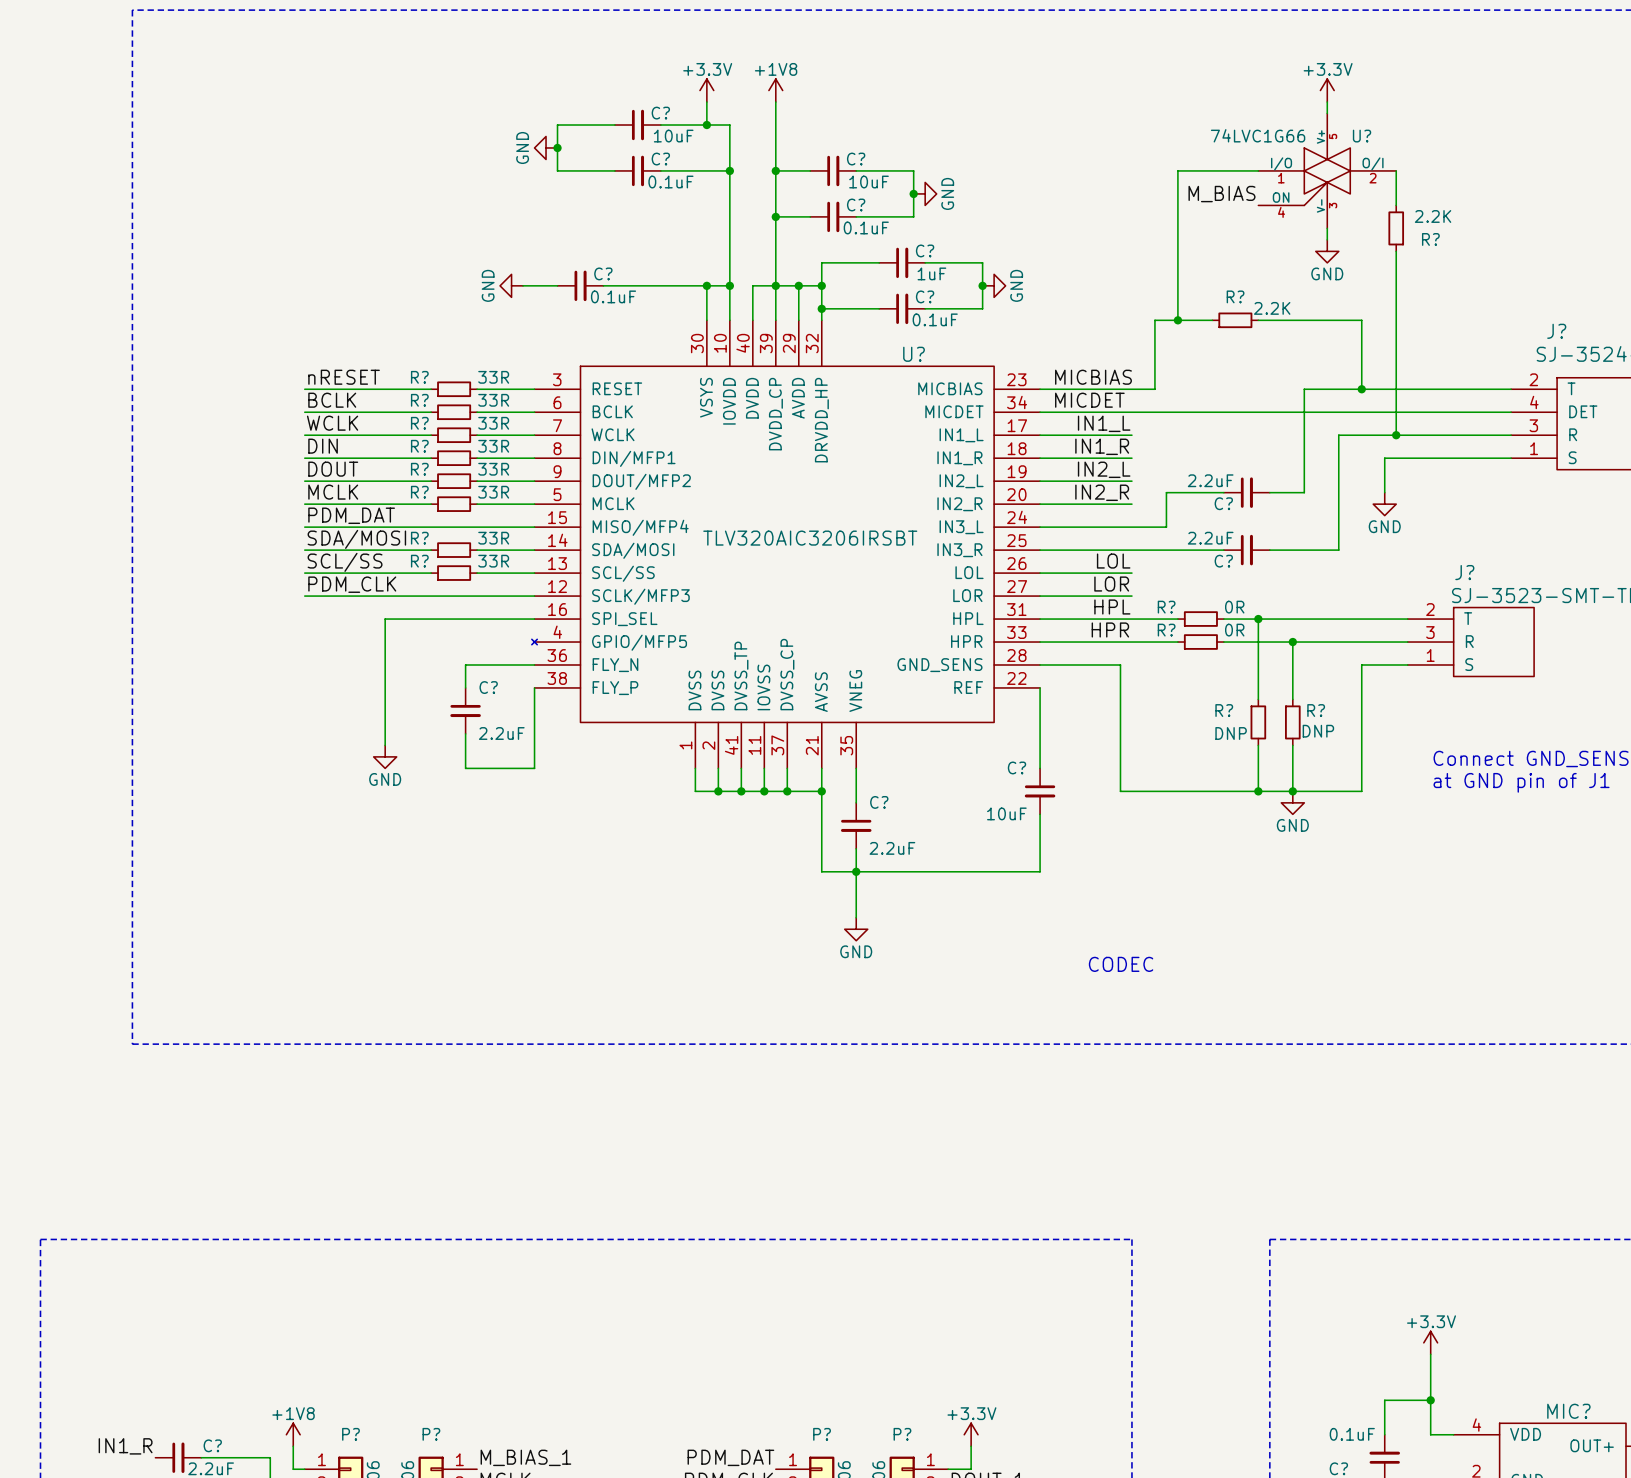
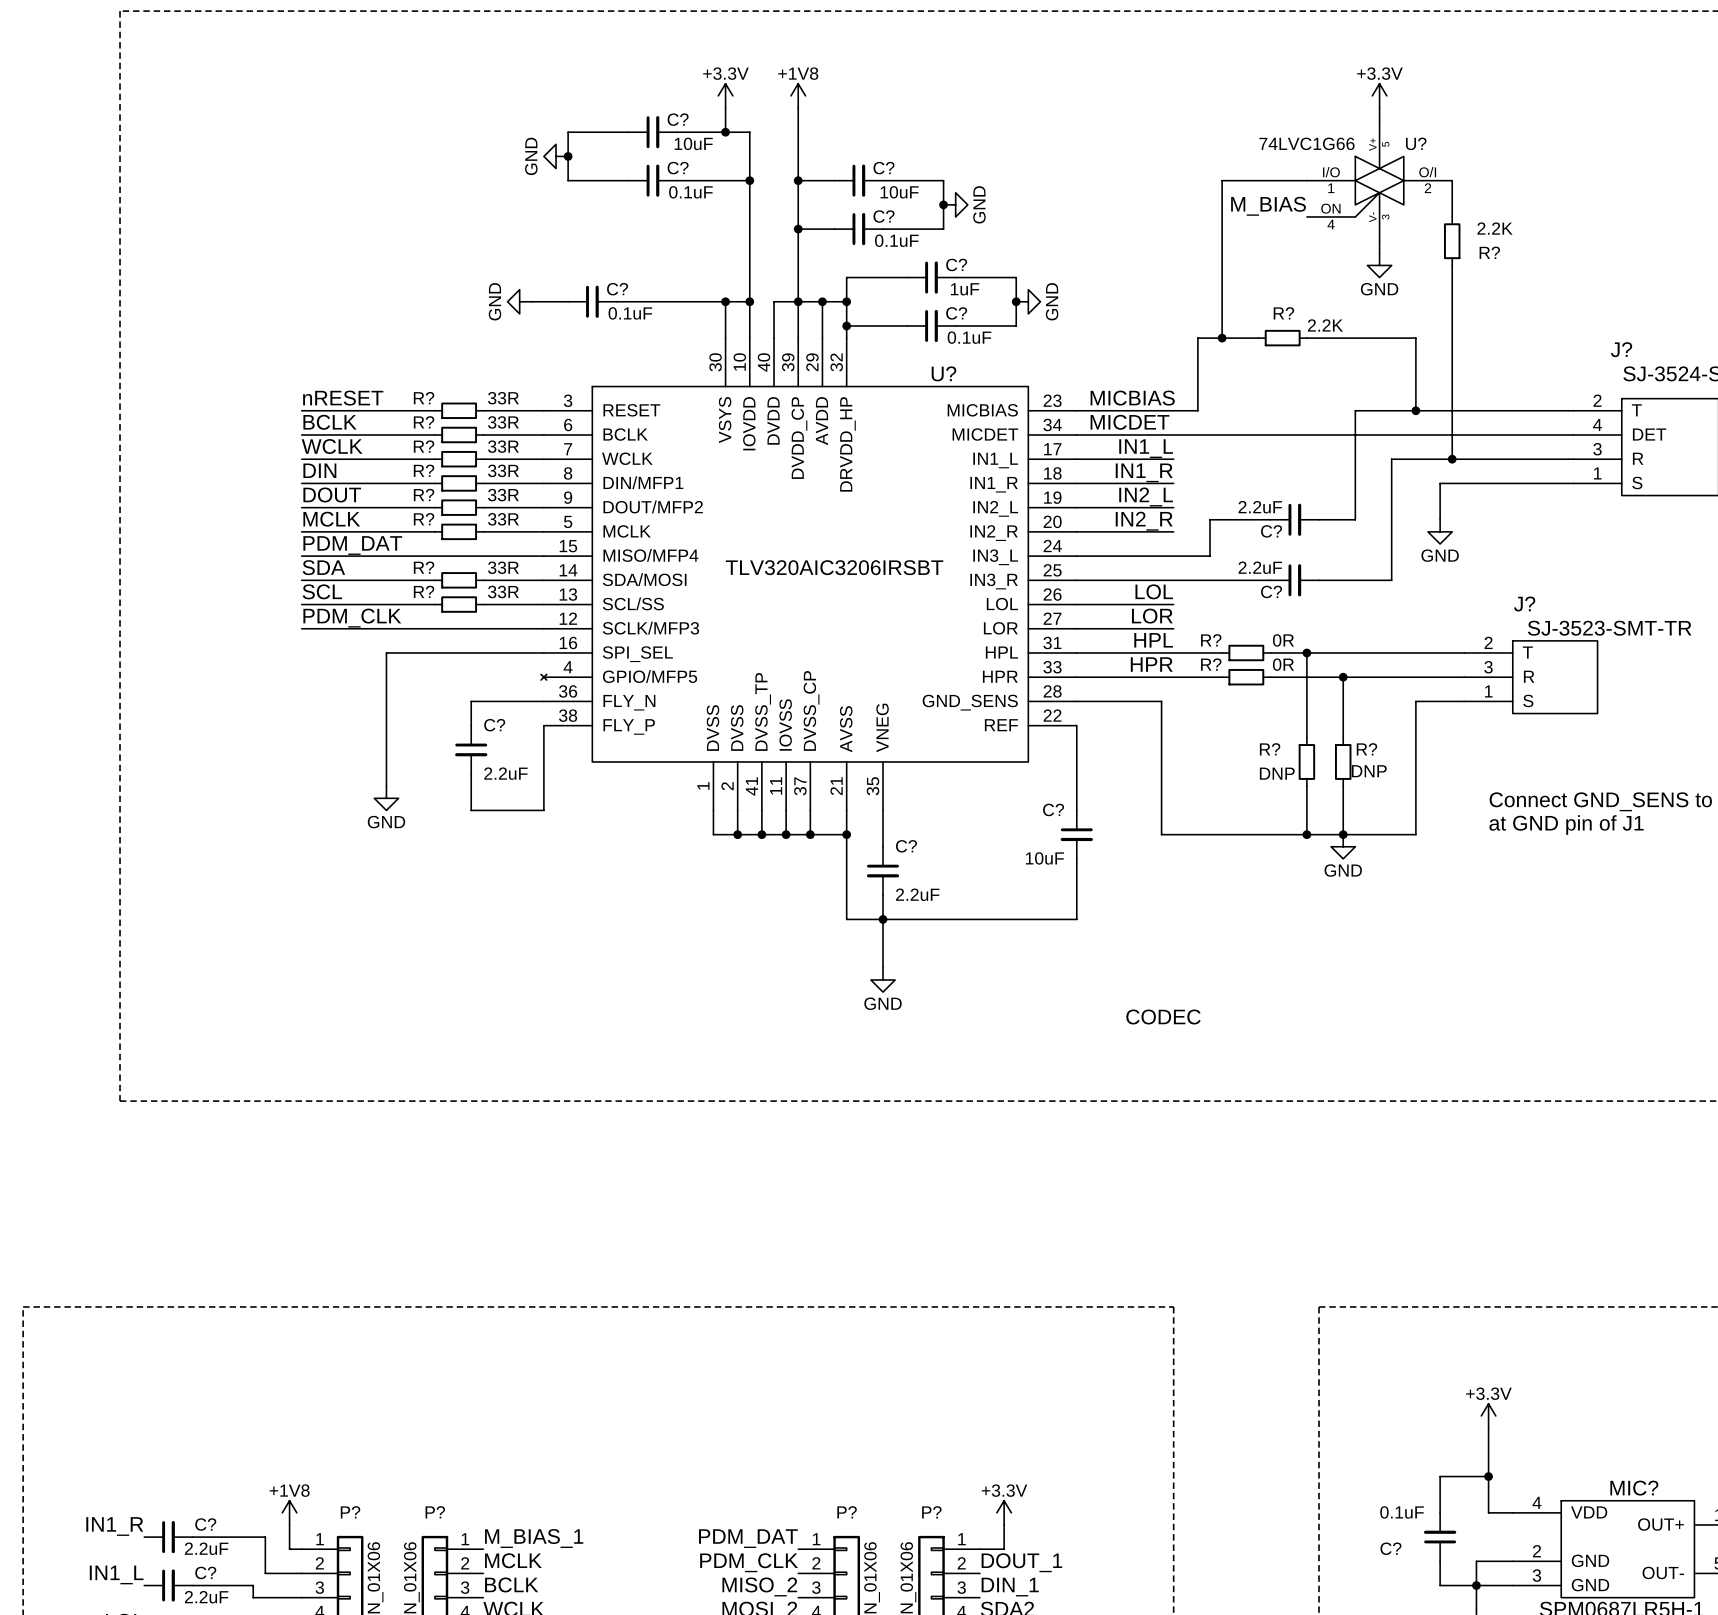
label: SDA/MOSI (356, 539) -> SDA (323, 567)
label: SCL/SS (345, 562) -> SCL (322, 591)

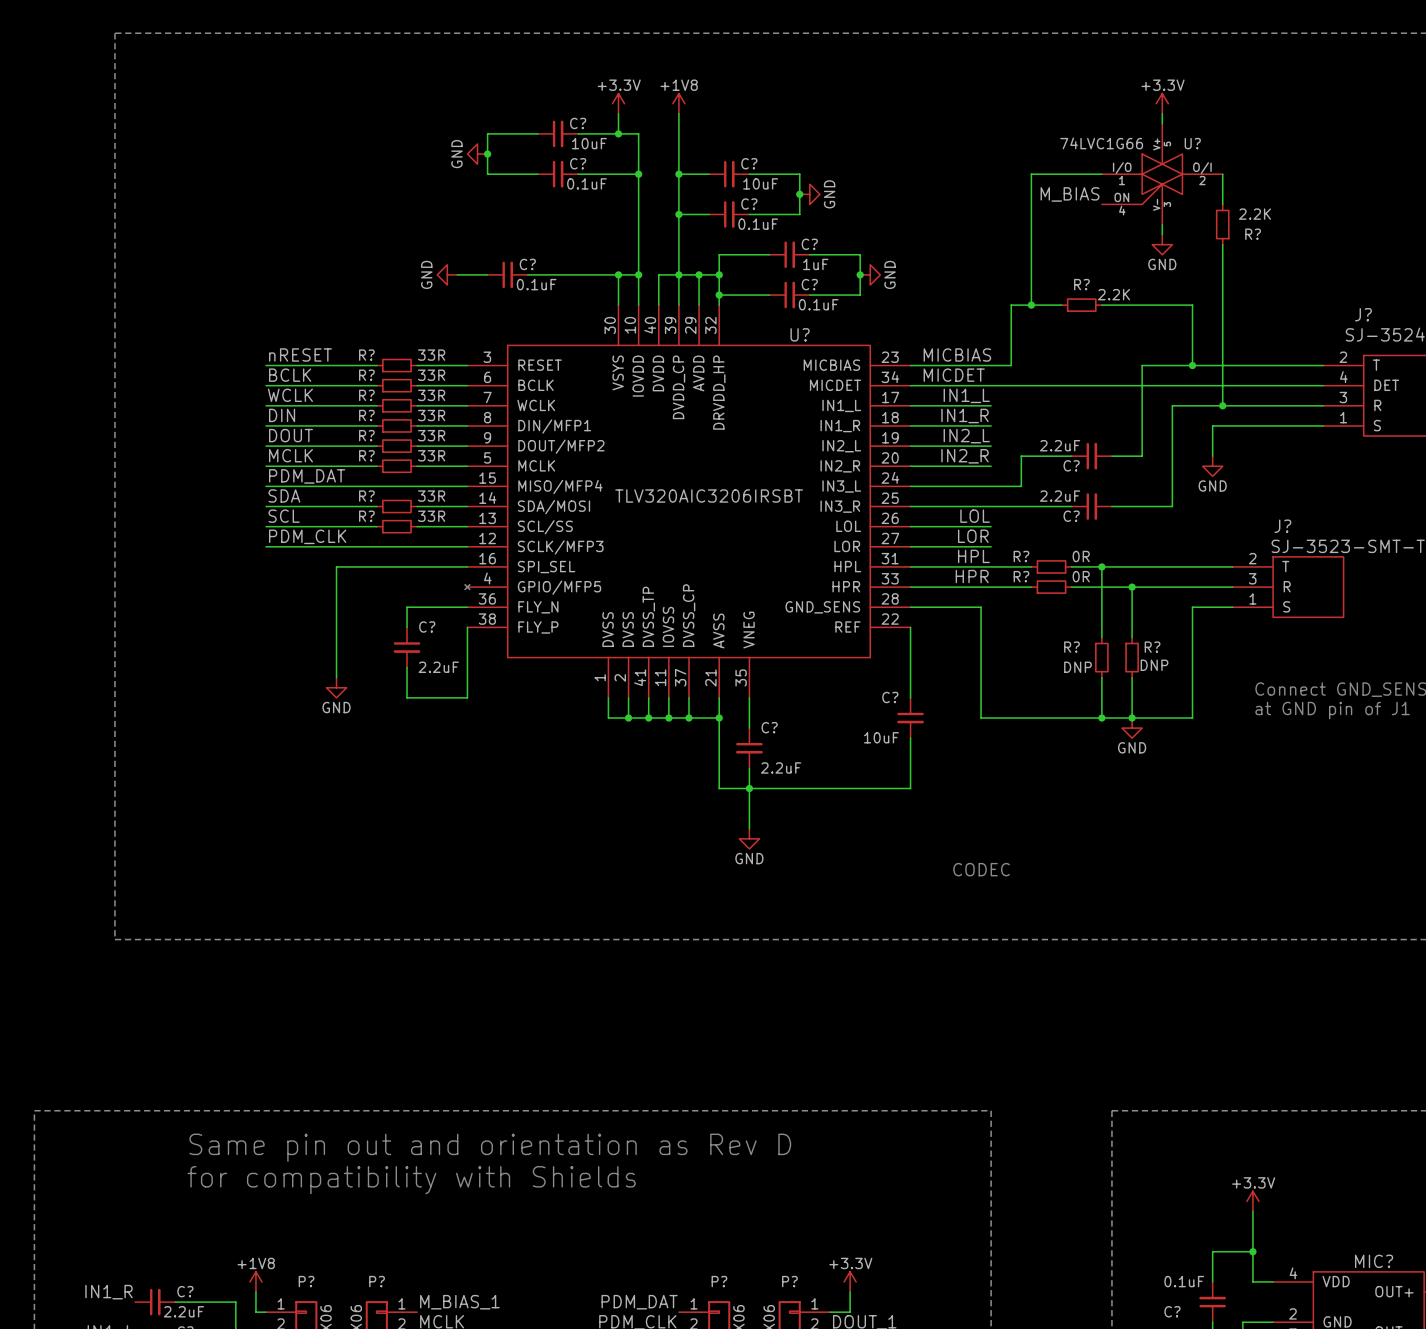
text: none -> Same pin out and orientation as Rev D (490, 1147)
text: none -> for compatibility with Shields (411, 1180)

